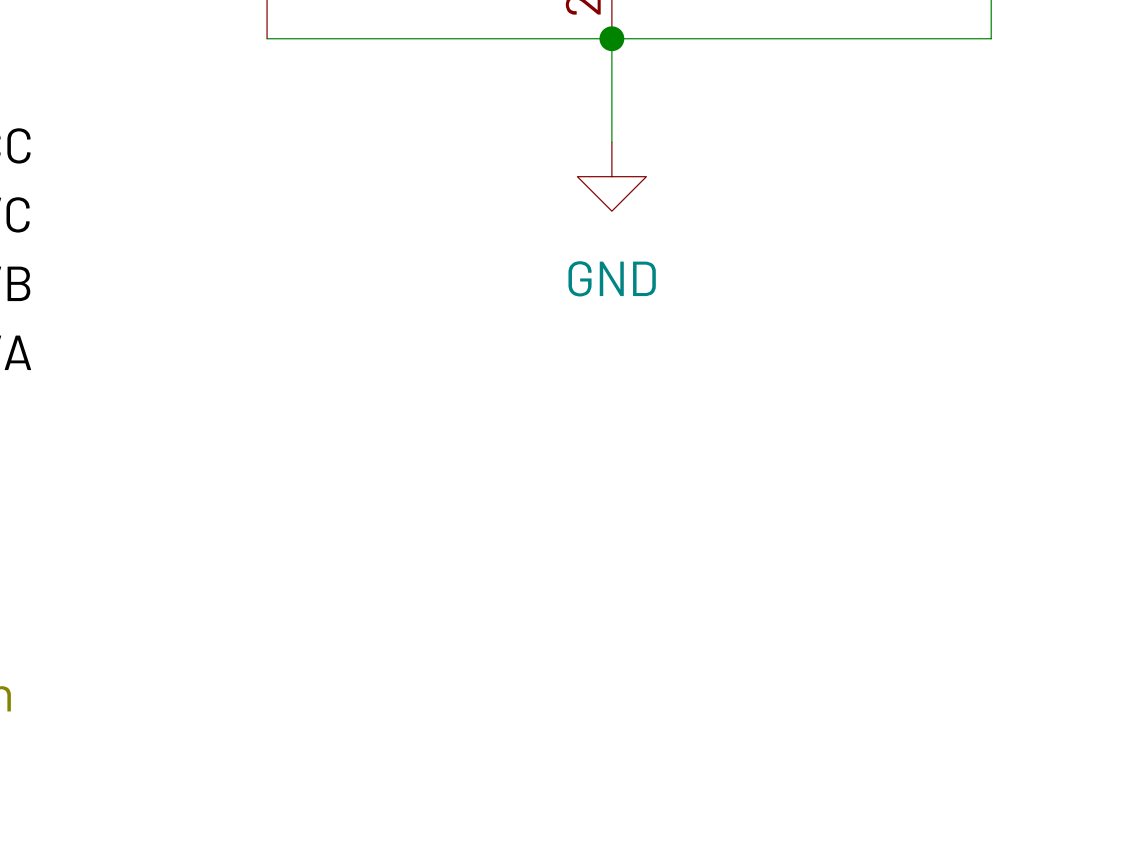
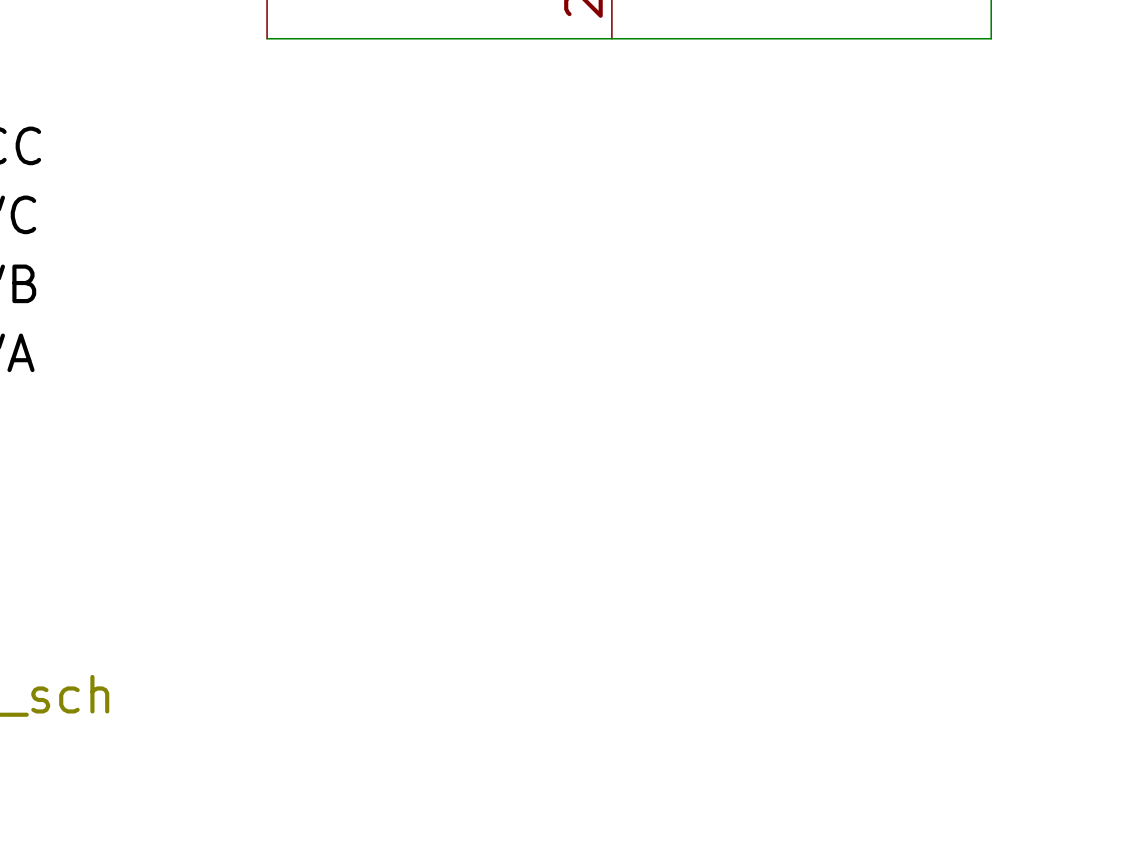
wire: (611, 38) (611, 142) -> none
junction: (611, 38) -> none
power symbol: GND (611, 176) -> none

